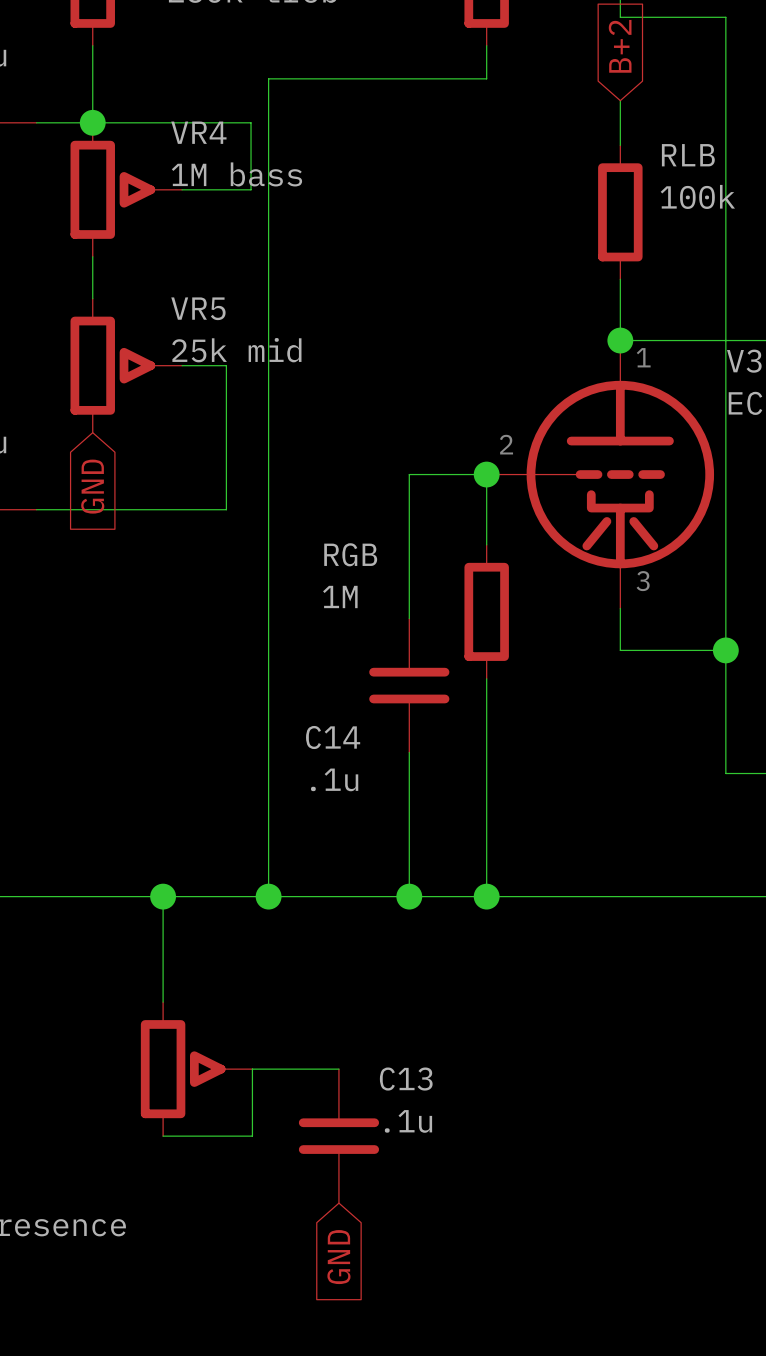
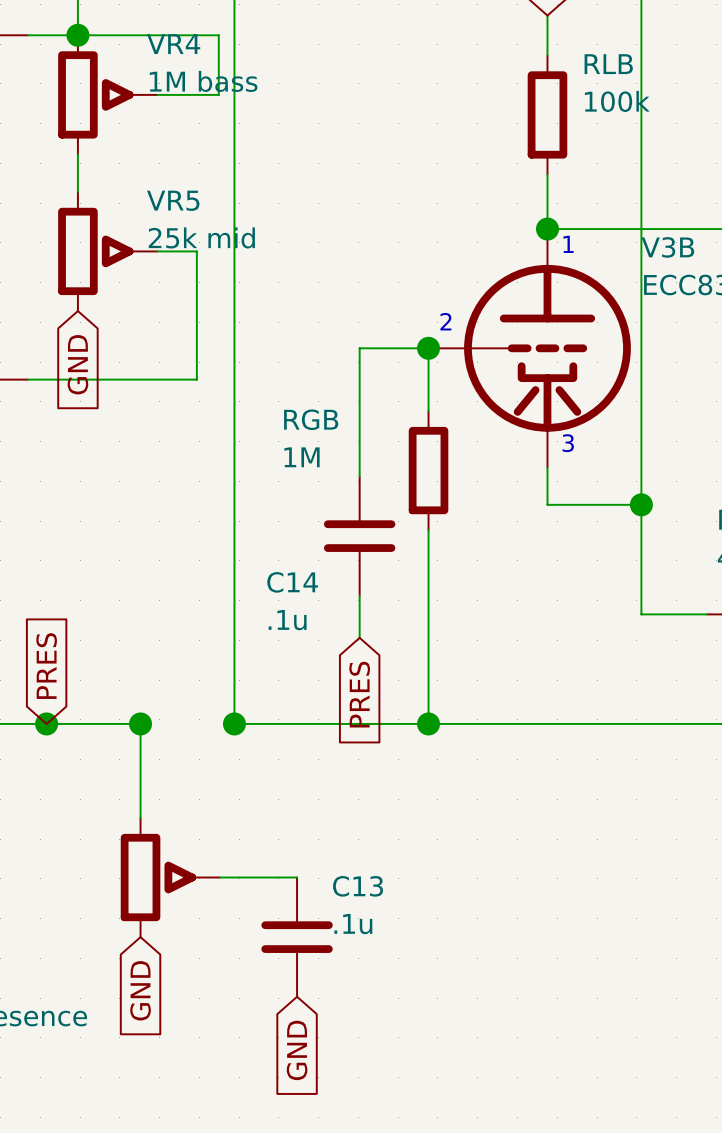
wire: (409, 799) (409, 896) -> none
global label: none -> PRES (46, 666)
global label: none -> PRES (359, 694)
junction: none -> (46, 723)
wire: (163, 896) (268, 896) -> none
junction: (409, 896) -> none
wire: (252, 1069) (252, 1136) (163, 1136) -> none
global label: none -> GND (140, 990)

